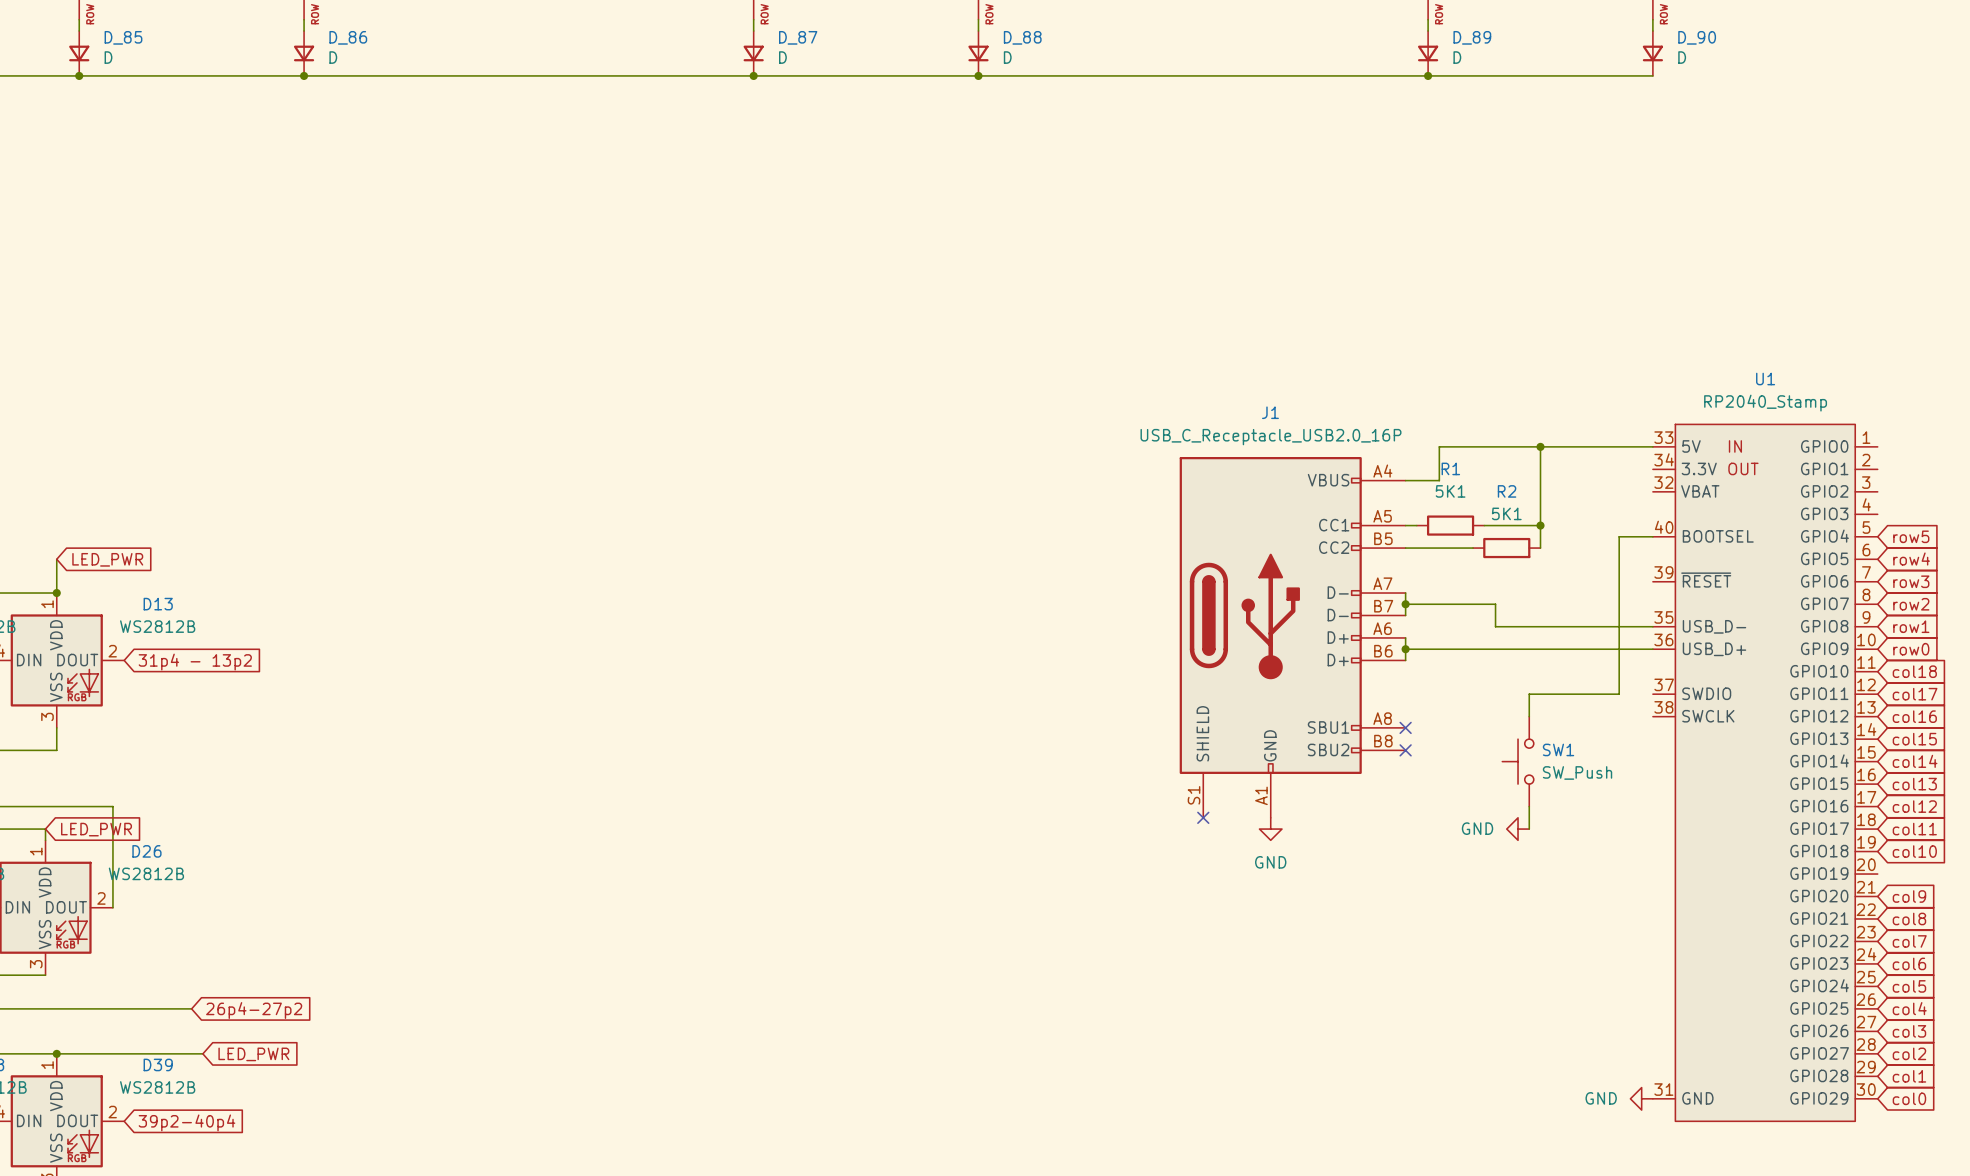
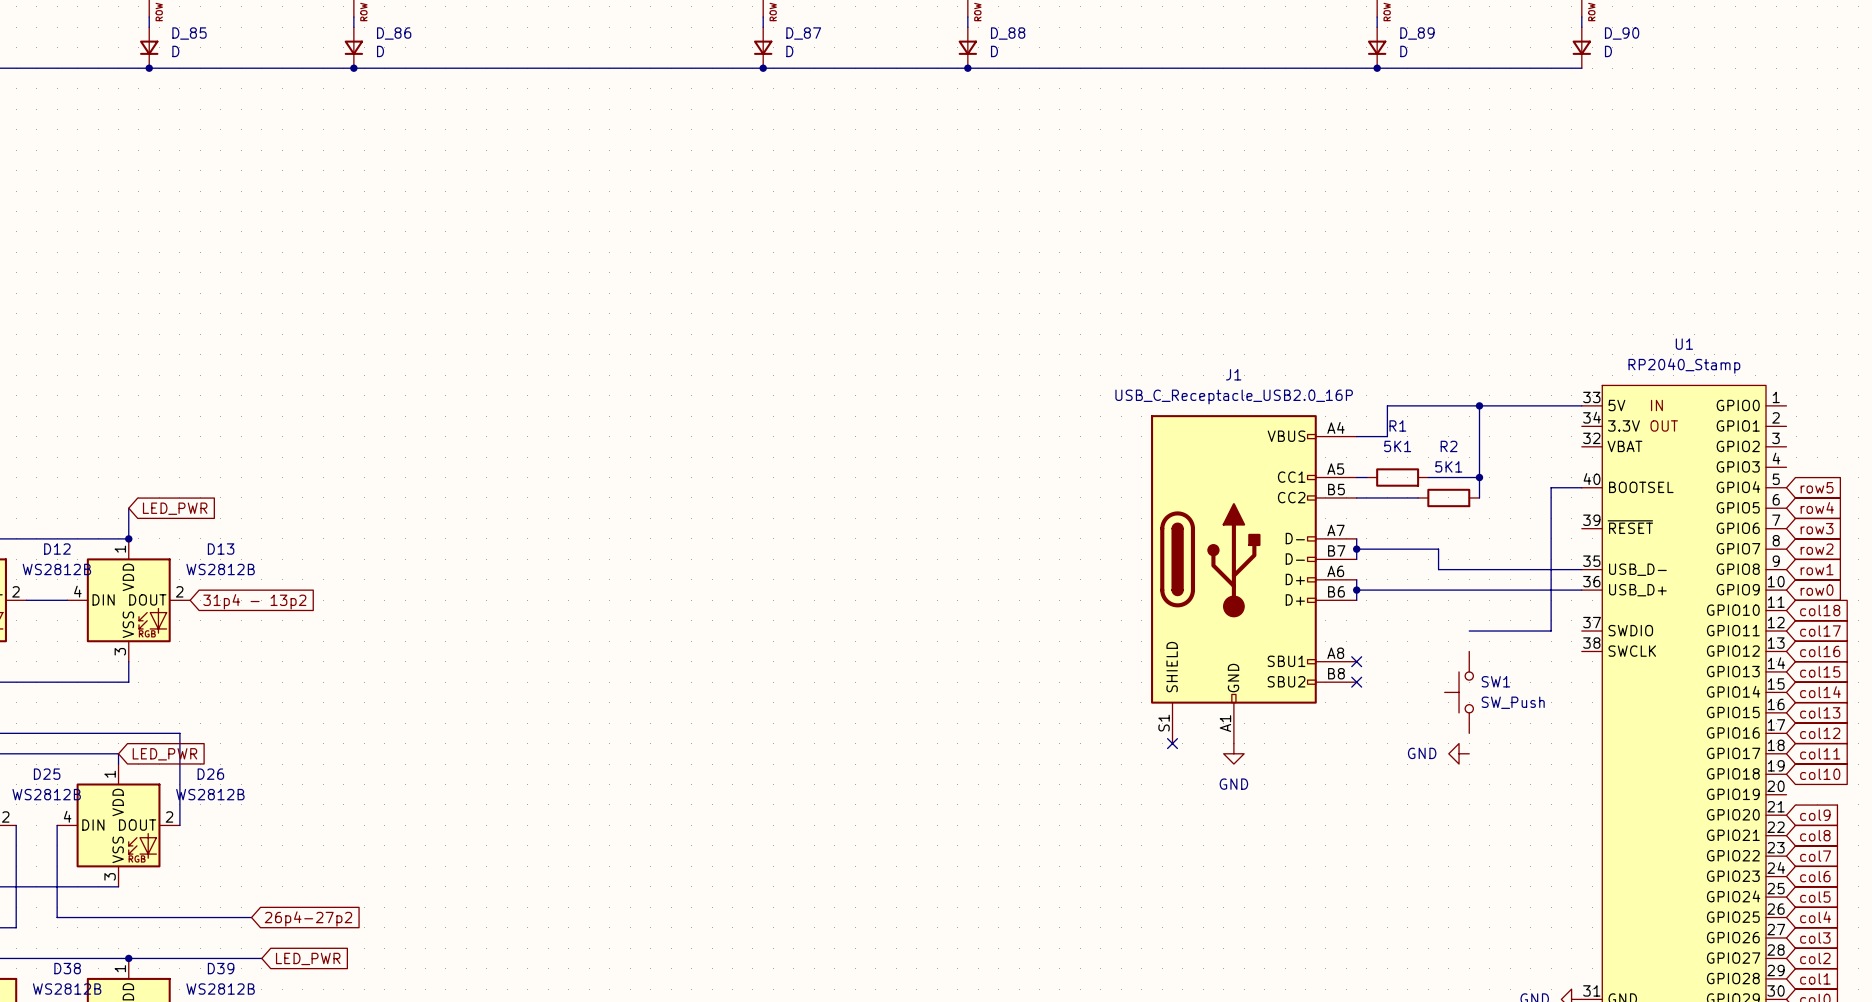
wire: (1529, 694) (1529, 716) -> none
wire: (1529, 806) (1529, 829) -> none

